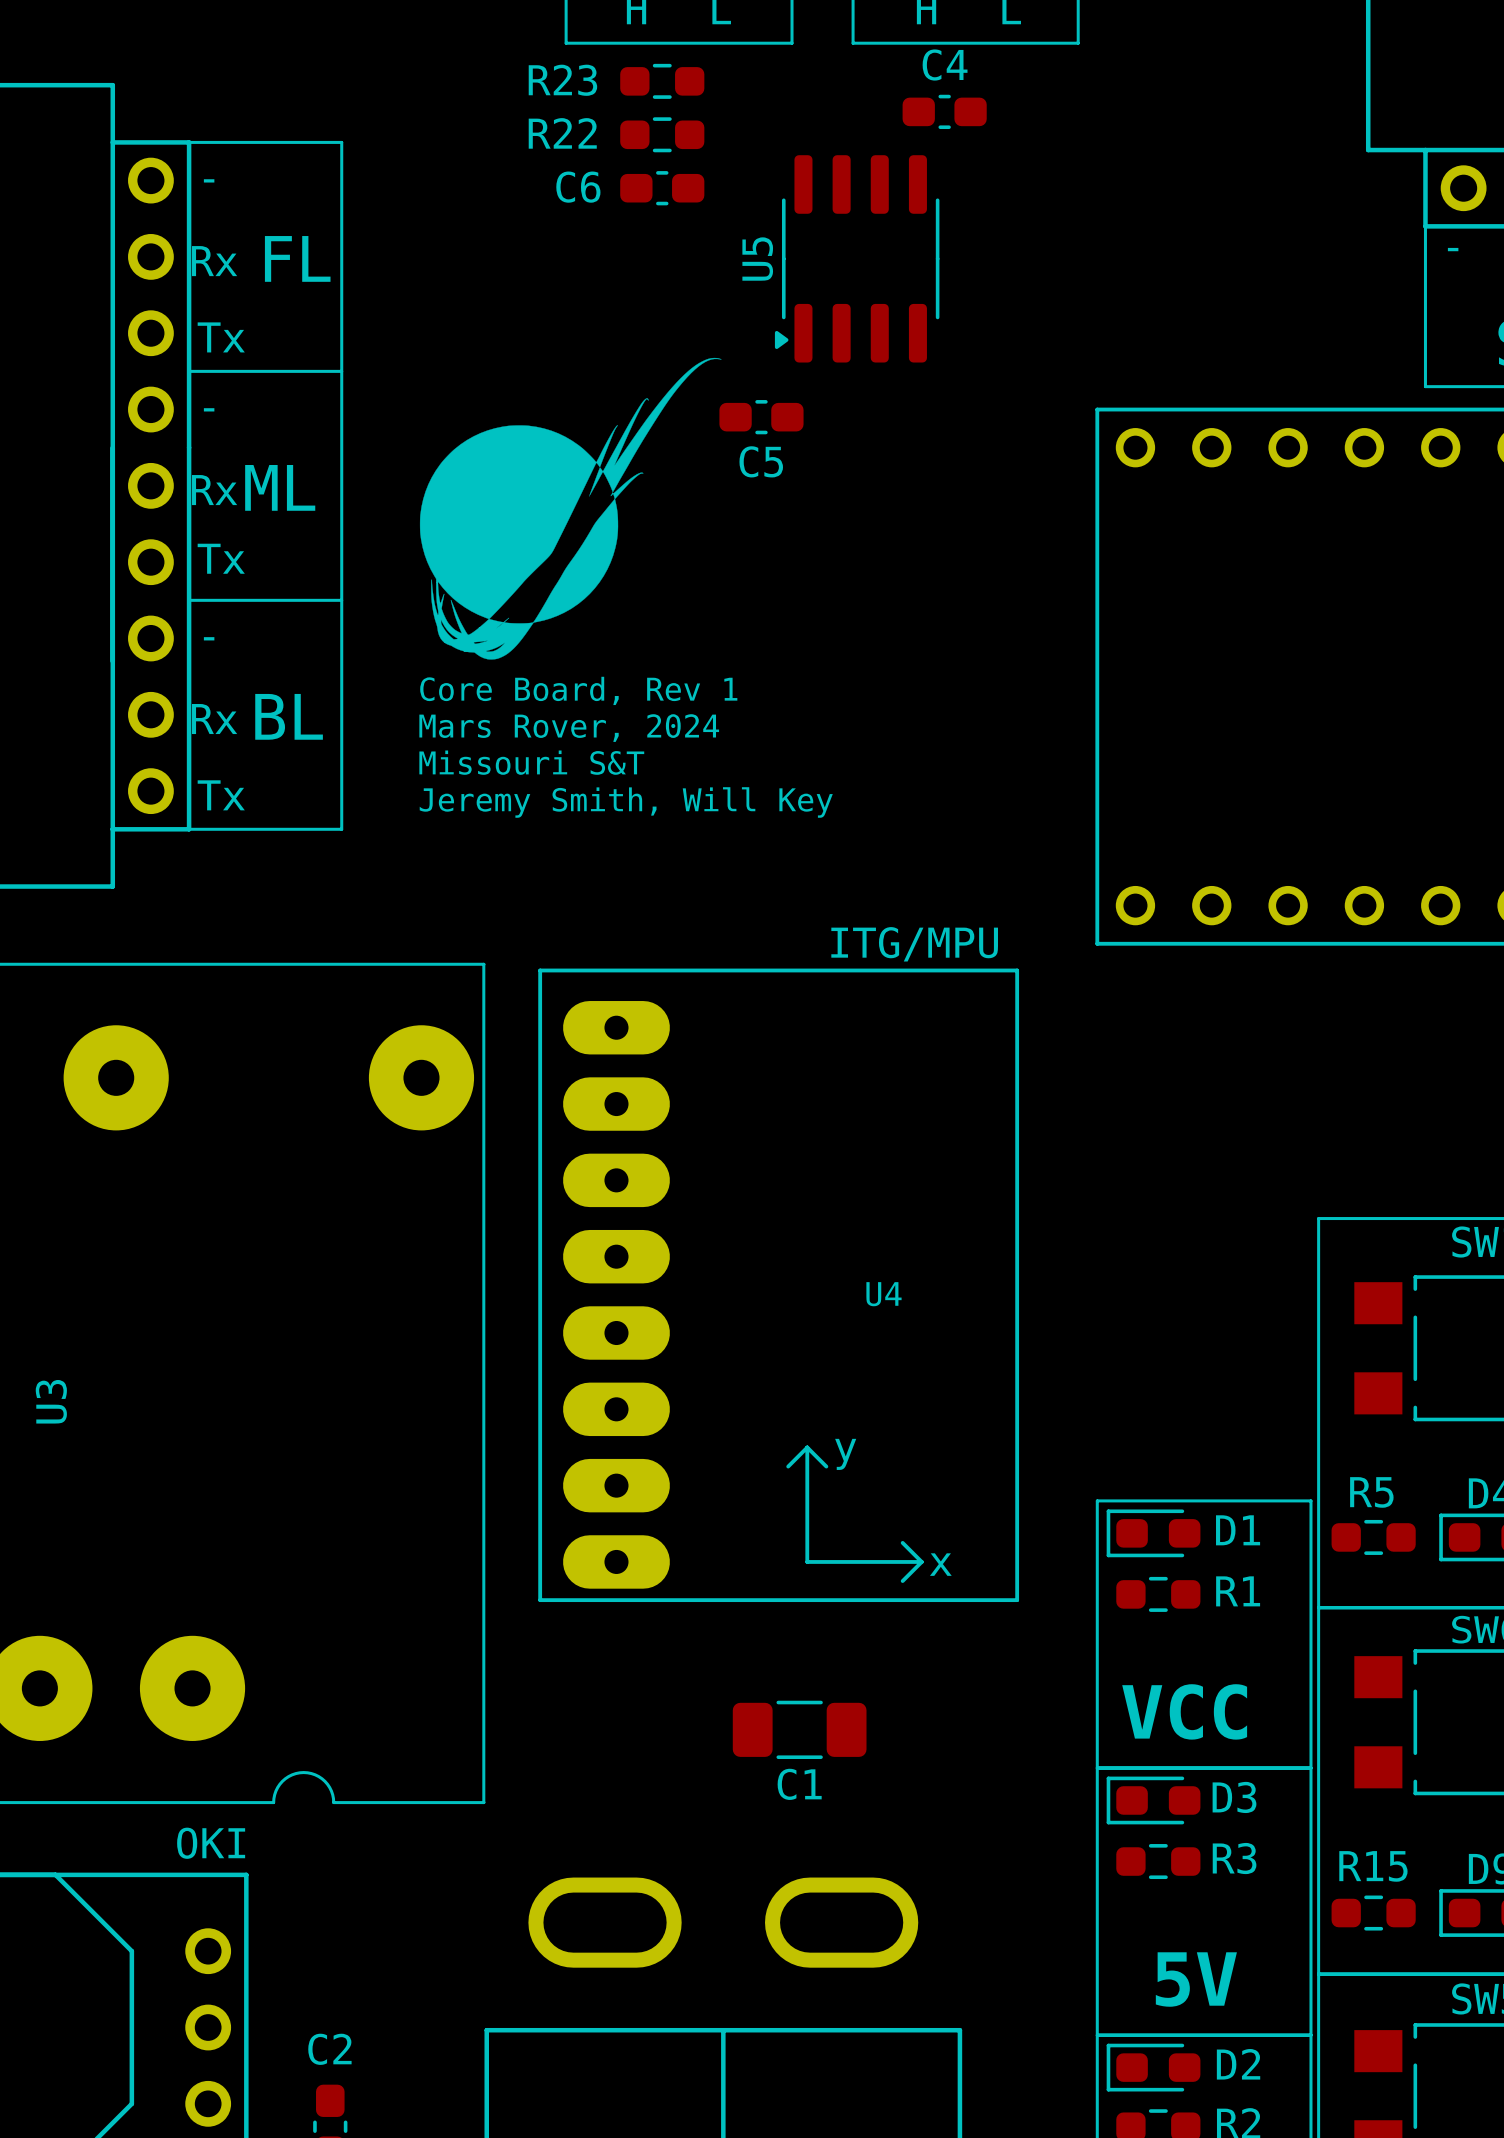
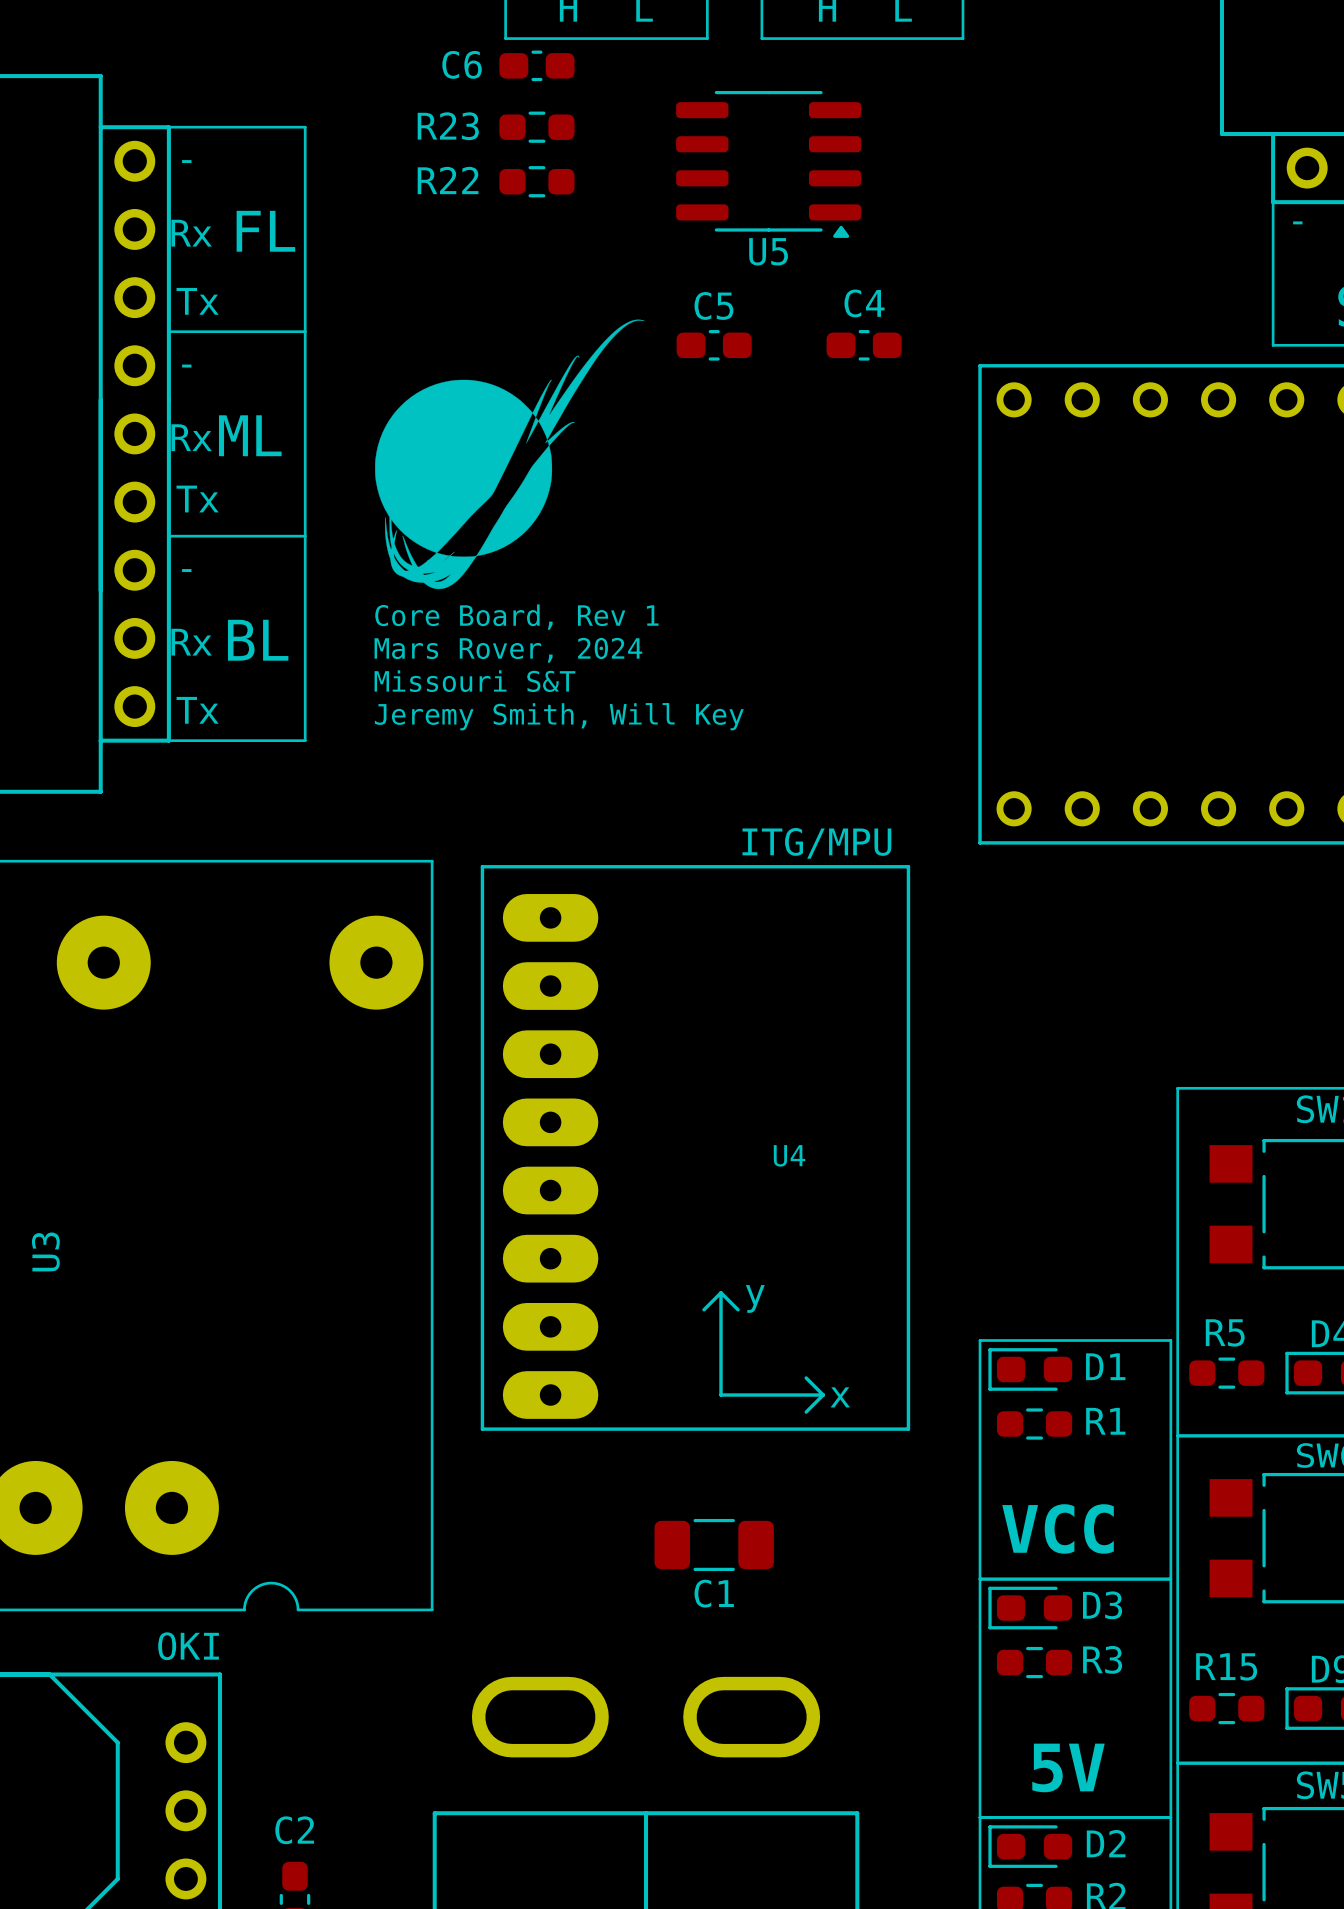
R23 position: (662, 81) -> (536, 127)
C4 position: (944, 111) -> (864, 345)
R22 position: (662, 134) -> (536, 181)
C6 position: (662, 188) -> (536, 65)
U5 rotation: 0° (857, 258) -> 90° counterclockwise (768, 164)
C5 position: (761, 417) -> (714, 345)
C5 name position: C5 (761, 461) -> C5 (713, 305)

